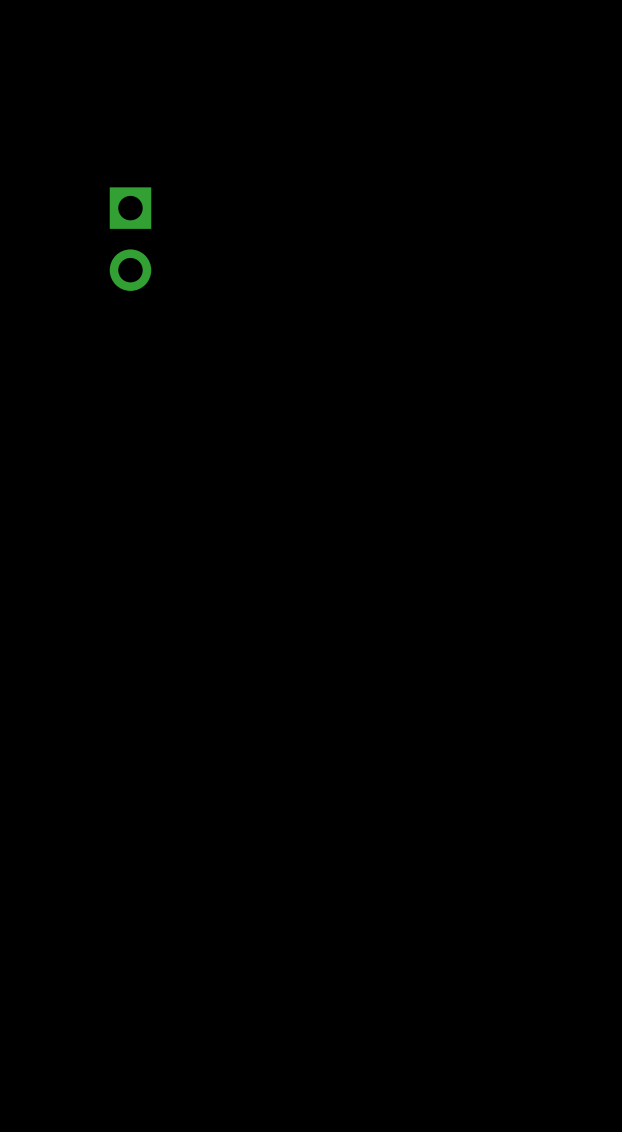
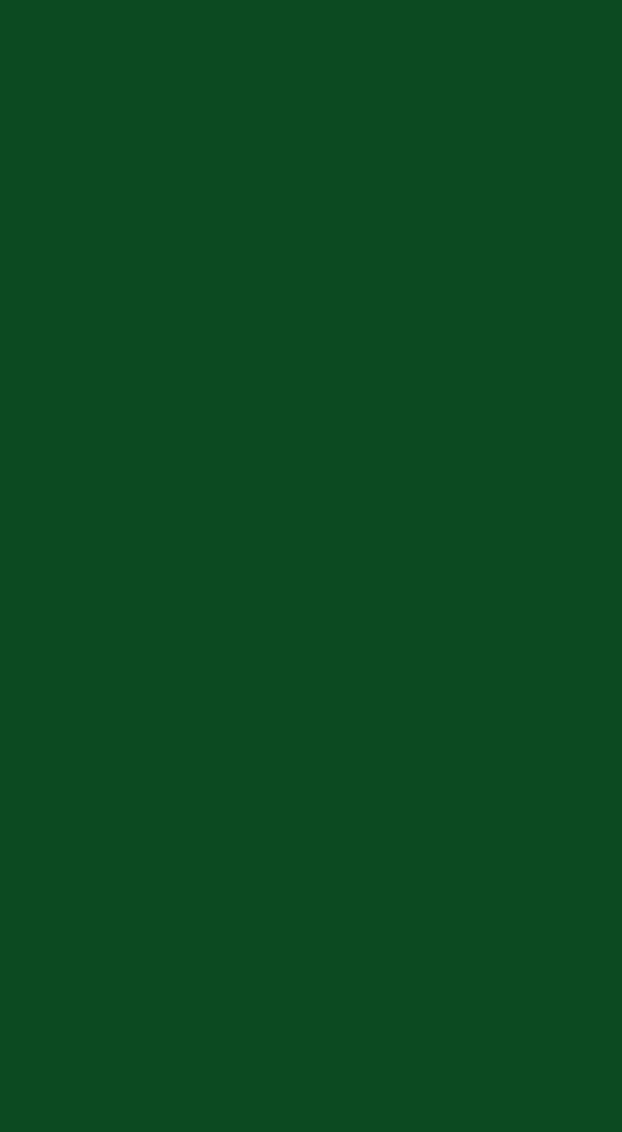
part: (130, 239) -> none

